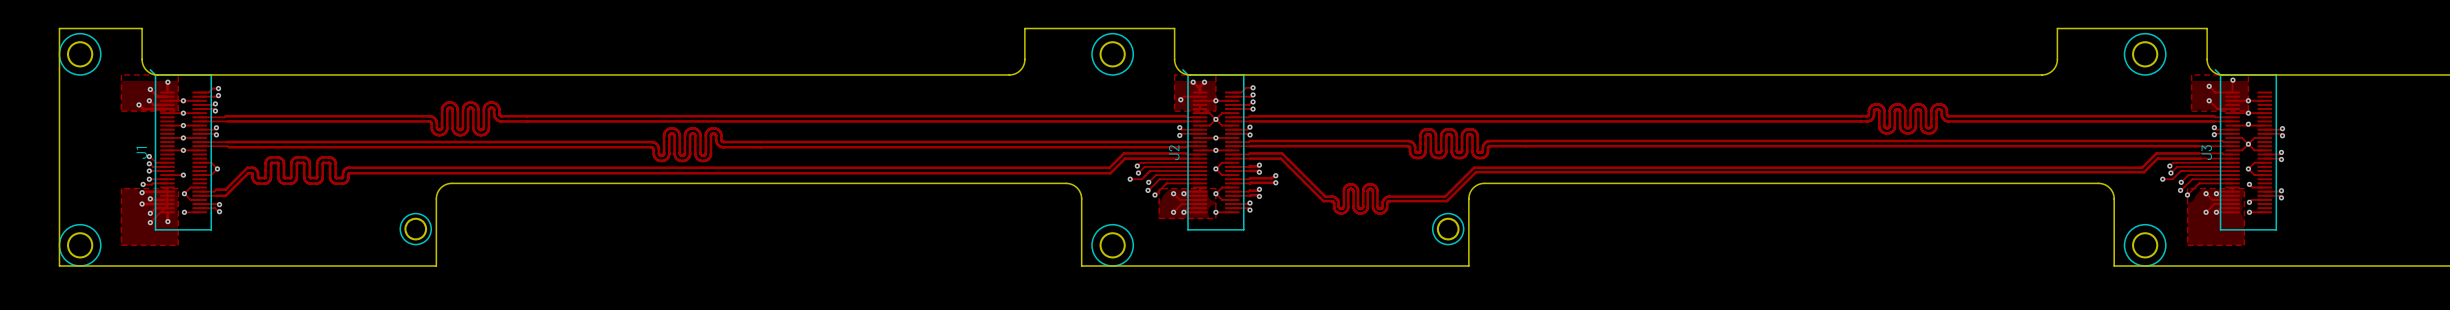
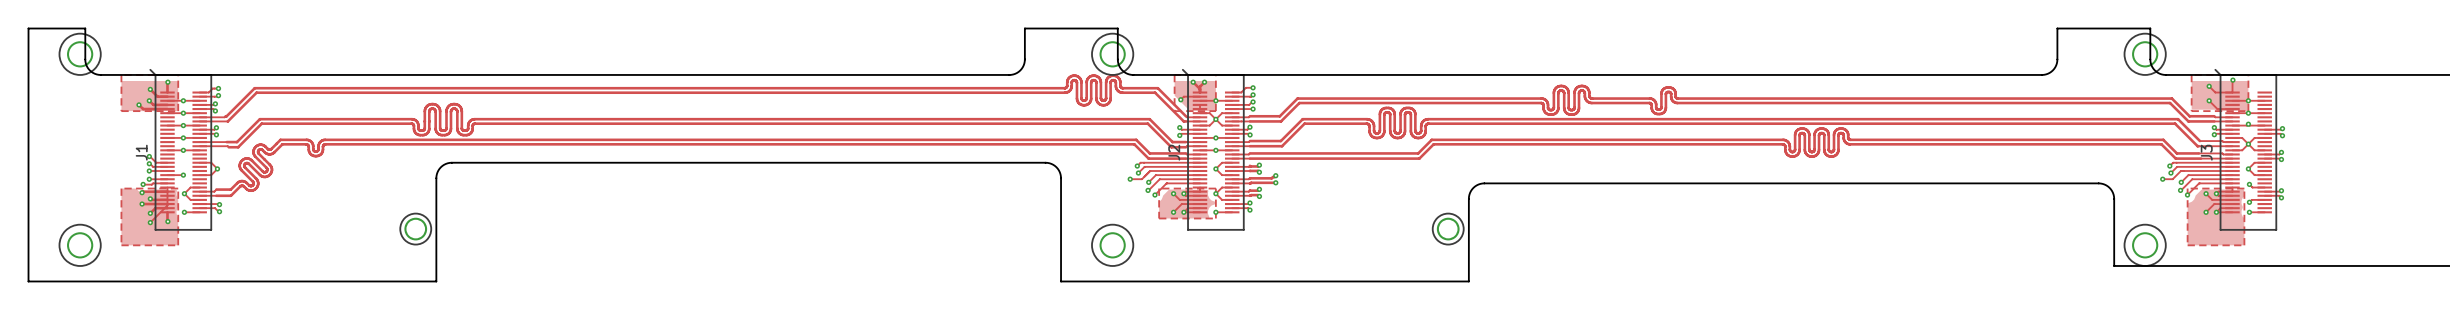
board edge: (59, 28) (59, 265) (436, 265) -> (59, 28) (28, 28) (28, 281) (436, 281) (436, 265)
board edge: (85, 28) (142, 28) (142, 63) (148, 71) (157, 74) -> (85, 28) (85, 61) (87, 67) (93, 72) (100, 74) (157, 74)
board edge: (1117, 28) (1174, 28) (1175, 63) (1180, 71) (1190, 74) -> (1117, 28) (1117, 61) (1119, 67) (1125, 72) (1133, 74) (1190, 74)
board edge: (2150, 28) (2207, 28) (2207, 63) (2213, 71) (2222, 74) -> (2150, 28) (2150, 61) (2152, 67) (2158, 72) (2165, 74) (2222, 74)
track: (226, 116) (429, 116) (435, 119) (437, 128) (439, 130) (442, 127) (442, 106) (449, 102) (457, 106) (457, 127) (460, 130) (462, 127) (463, 106) (470, 102) (477, 106) (478, 127) (481, 130) (483, 127) (484, 106) (491, 102) (497, 105) (499, 114) (501, 116) (1185, 116) -> (226, 116) (254, 88) (1064, 88) (1066, 86) (1068, 78) (1073, 75) (1080, 79) (1082, 100) (1086, 98) (1086, 80) (1089, 77) (1095, 75) (1100, 79) (1100, 98) (1103, 100) (1106, 98) (1106, 79) (1109, 76) (1115, 75) (1119, 79) (1122, 88) (1157, 88) (1185, 116)
track: (1279, 116) (1866, 116) (1870, 107) (1877, 104) (1883, 108) (1884, 126) (1887, 128) (1889, 126) (1890, 108) (1893, 105) (1898, 104) (1904, 108) (1905, 126) (1908, 128) (1910, 126) (1911, 108) (1914, 105) (1919, 104) (1925, 109) (1927, 127) (1931, 126) (1931, 118) -> (1279, 116) (1297, 98) (1541, 98) (1546, 100) (1548, 108) (1551, 110) (1553, 108) (1554, 89) (1560, 85) (1567, 89) (1568, 108) (1571, 110) (1574, 108) (1575, 89) (1582, 85) (1587, 88) (1591, 98) (1651, 98) (1654, 100) (1658, 109) (1661, 107) (1662, 91) (1669, 87) (1674, 89) (1677, 98) (2171, 98) (2189, 116)
track: (2189, 116) (1948, 116) (1945, 107) (1938, 104) (1932, 108) (1931, 118) -> none
track: (1936, 118) (1935, 129) (1929, 133) (1924, 132) (1921, 129) (1920, 111) (1918, 109) (1915, 111) (1915, 129) (1908, 133) (1903, 132) (1900, 129) (1900, 111) (1898, 109) (1894, 111) (1894, 129) (1888, 133) (1883, 132) (1879, 129) (1879, 111) (1877, 109) (1874, 110) (1872, 118) (1867, 121) (1281, 121) -> (2188, 121) (2170, 103) (1677, 103) (1672, 100) (1669, 92) (1665, 93) (1665, 110) (1657, 114) (1653, 111) (1650, 103) (1590, 102) (1586, 100) (1584, 92) (1581, 90) (1579, 92) (1578, 110) (1572, 114) (1564, 110) (1564, 92) (1561, 90) (1558, 92) (1557, 110) (1551, 114) (1544, 112) (1541, 103) (1299, 103) (1281, 121)
track: (1936, 118) (1936, 111) (1939, 109) (1943, 118) (1948, 121) (2188, 121) -> none
track: (227, 121) (429, 121) (431, 122) (433, 132) (439, 135) (446, 131) (447, 109) (449, 107) (452, 109) (454, 132) (462, 134) (466, 132) (468, 127) -> (237, 142) (259, 119) (411, 119) (417, 121) (418, 129) (422, 130) (424, 128) (425, 109) (427, 105) (432, 104) (437, 105) (439, 109) (441, 130) (446, 129) (446, 109) (449, 105) (453, 104) (459, 105) (461, 109) (462, 129) (466, 130) (468, 127)
track: none -> (227, 121) (256, 92) (1065, 92) (1070, 90) (1071, 81) (1074, 80) (1076, 82) (1077, 100) (1080, 104) (1085, 105) (1090, 101) (1091, 82) (1093, 80) (1096, 82) (1097, 101) (1101, 105) (1108, 103) (1110, 100) (1110, 82) (1113, 80) (1116, 88) (1121, 92) (1155, 92) (1183, 121)
track: none -> (429, 121) (428, 131) (422, 135) (415, 132) (411, 123) (261, 123) (238, 147)
track: (1183, 121) (501, 121) (495, 118) (493, 109) (491, 107) (489, 109) (488, 131) (480, 135) (474, 131) (473, 109) (470, 107) (468, 109) (468, 125) -> (1172, 142) (1149, 119) (474, 119) (470, 120) (468, 125)
track: (1280, 141) (1408, 141) (1413, 143) (1417, 152) (1420, 151) (1420, 143) -> none
track: (2199, 141) (1489, 141) (1484, 143) (1482, 151) (1479, 152) (1477, 151) (1476, 133) (1473, 129) (1468, 129) (1462, 133) (1462, 151) (1458, 152) (1456, 151) (1456, 133) (1452, 129) (1448, 129) (1441, 133) (1441, 151) (1438, 152) (1436, 151) (1435, 133) (1432, 129) (1427, 129) (1421, 133) (1420, 143) -> (2199, 141) (2178, 119) (1428, 119) (1422, 121) (1420, 131) (1418, 133) (1415, 131) (1414, 111) (1409, 107) (1401, 111) (1400, 131) (1398, 133) (1394, 131) (1394, 111) (1386, 107) (1380, 112) (1379, 131) (1377, 133) (1374, 131) (1372, 121) (1368, 119) (1302, 119) (1280, 141)
track: (237, 142) (651, 142) (657, 144) (659, 154) (661, 155) (664, 153) (664, 132) (671, 128) (678, 132) (679, 153) (682, 155) (684, 153) (685, 132) (692, 128) (699, 132) (700, 153) (703, 155) (705, 153) (706, 132) (713, 128) (719, 131) (721, 140) (723, 142) (1172, 142) -> none
track: (1425, 143) (1425, 135) (1429, 134) (1431, 152) (1437, 158) (1442, 157) (1445, 154) (1446, 135) (1448, 134) (1451, 135) (1452, 154) (1458, 158) (1463, 157) (1466, 154) (1467, 135) (1469, 134) (1472, 135) (1473, 154) (1479, 158) (1486, 155) (1490, 146) (2197, 146) -> (1282, 146) (1304, 123) (1367, 123) (1371, 135) (1378, 137) (1384, 132) (1384, 114) (1386, 112) (1390, 114) (1390, 134) (1397, 138) (1404, 134) (1405, 114) (1408, 112) (1410, 114) (1411, 134) (1417, 138) (1424, 135) (1425, 125) (1428, 123) (2175, 123) (2197, 146)
track: (1425, 143) (1424, 154) (1418, 158) (1411, 155) (1407, 146) (1282, 146) -> none
track: (238, 147) (651, 147) (653, 148) (655, 158) (661, 160) (668, 156) (669, 135) (671, 133) (674, 135) (675, 156) (681, 160) (689, 156) (690, 135) (692, 133) (695, 135) (696, 156) (702, 160) (710, 156) (711, 135) (713, 133) (715, 135) (717, 144) (723, 147) (1171, 147) -> (429, 121) (429, 111) (433, 108) (435, 111) (435, 130) (442, 135) (447, 134) (450, 131) (451, 111) (454, 108) (457, 111) (457, 131) (463, 135) (471, 132) (475, 123) (1147, 123) (1171, 147)
track: (1149, 153) (1123, 153) (1109, 167) (349, 167) (344, 170) (342, 177) (336, 178) (334, 159) (323, 157) (317, 162) (317, 177) (310, 178) (308, 159) (297, 157) (291, 162) (291, 177) (285, 178) (282, 159) (271, 157) (266, 160) (265, 170) -> (1149, 153) (1136, 139) (325, 139) (319, 142) (318, 150) (315, 151)
track: (1282, 153) (1325, 196) (1336, 198) (1341, 208) (1343, 206) (1344, 189) (1349, 184) (1354, 185) (1357, 188) (1358, 206) (1360, 208) (1363, 206) (1363, 188) (1368, 184) (1374, 185) (1377, 189) (1377, 206) (1380, 208) (1383, 200) (1387, 196) (1445, 196) (1474, 167) (2142, 167) (2156, 153) (2176, 153) -> (1282, 153) (1418, 153) (1431, 139) (1783, 139) (1788, 142) (1790, 150) (1792, 152) (1795, 150) (1795, 132) (1801, 128) (1808, 132) (1809, 150) (1811, 152) (1814, 150) (1814, 133) (1816, 130) (1822, 128) (1827, 131) (1828, 150) (1831, 152) (1833, 150) (1834, 132) (1841, 128) (1846, 131) (1850, 139) (2163, 139) (2176, 153)
track: (1148, 158) (1125, 158) (1110, 173) (349, 173) (346, 182) (336, 183) (330, 178) (329, 163) (323, 162) (321, 181) (310, 183) (304, 178) (304, 163) (297, 162) (295, 181) (284, 183) (278, 178) (278, 163) (271, 163) (271, 170) -> (1148, 158) (1134, 144) (325, 144) (323, 145) (321, 153) (316, 156) (310, 153) (306, 144) (282, 144) (271, 153) (267, 153) (261, 149) (258, 151) (271, 167) (271, 171) (268, 175) (261, 175) (248, 163) (244, 164) (244, 167) (257, 181) (255, 188) (250, 190) (241, 185) (230, 195) (225, 195)
track: (1280, 158) (1323, 201) (1333, 201) (1335, 210) (1340, 213) (1347, 209) (1348, 190) (1350, 188) (1353, 190) (1353, 208) (1356, 211) (1362, 213) (1367, 209) (1367, 190) (1370, 188) (1372, 190) (1373, 209) (1376, 212) (1381, 213) (1386, 209) (1389, 201) (1447, 201) (1475, 172) (2144, 172) (2157, 158) (2175, 158) -> (1280, 158) (1419, 158) (1433, 144) (1782, 144) (1785, 145) (1786, 154) (1792, 156) (1798, 152) (1799, 134) (1801, 133) (1804, 134) (1805, 152) (1811, 156) (1818, 152) (1819, 134) (1821, 133) (1824, 134) (1825, 154) (1830, 156) (1835, 155) (1838, 151) (1838, 134) (1841, 133) (1845, 141) (1850, 144) (2161, 144) (2175, 158)
track: (265, 170) (265, 177) (258, 178) (255, 169) (247, 167) (225, 189) -> (315, 151) (313, 150) (311, 142) (308, 140) (280, 139) (269, 149) (262, 145) (258, 145) (254, 148) (253, 154) (266, 168) (266, 171) (263, 171) (250, 159) (244, 158) (240, 162) (240, 167) (253, 182) (253, 184) (250, 185) (241, 181) (230, 189) (225, 189)
track: (270, 170) (270, 178) (267, 182) (256, 182) (253, 180) (252, 173) (248, 173) (225, 195) -> none
board edge: (436, 198) (440, 187) (451, 183) (1066, 183) (1075, 186) (1081, 196) (1081, 265) (1468, 265) -> (436, 198) (437, 172) (444, 164) (451, 162) (1045, 162) (1056, 167) (1060, 176) (1061, 281) (1468, 281) (1468, 265)

